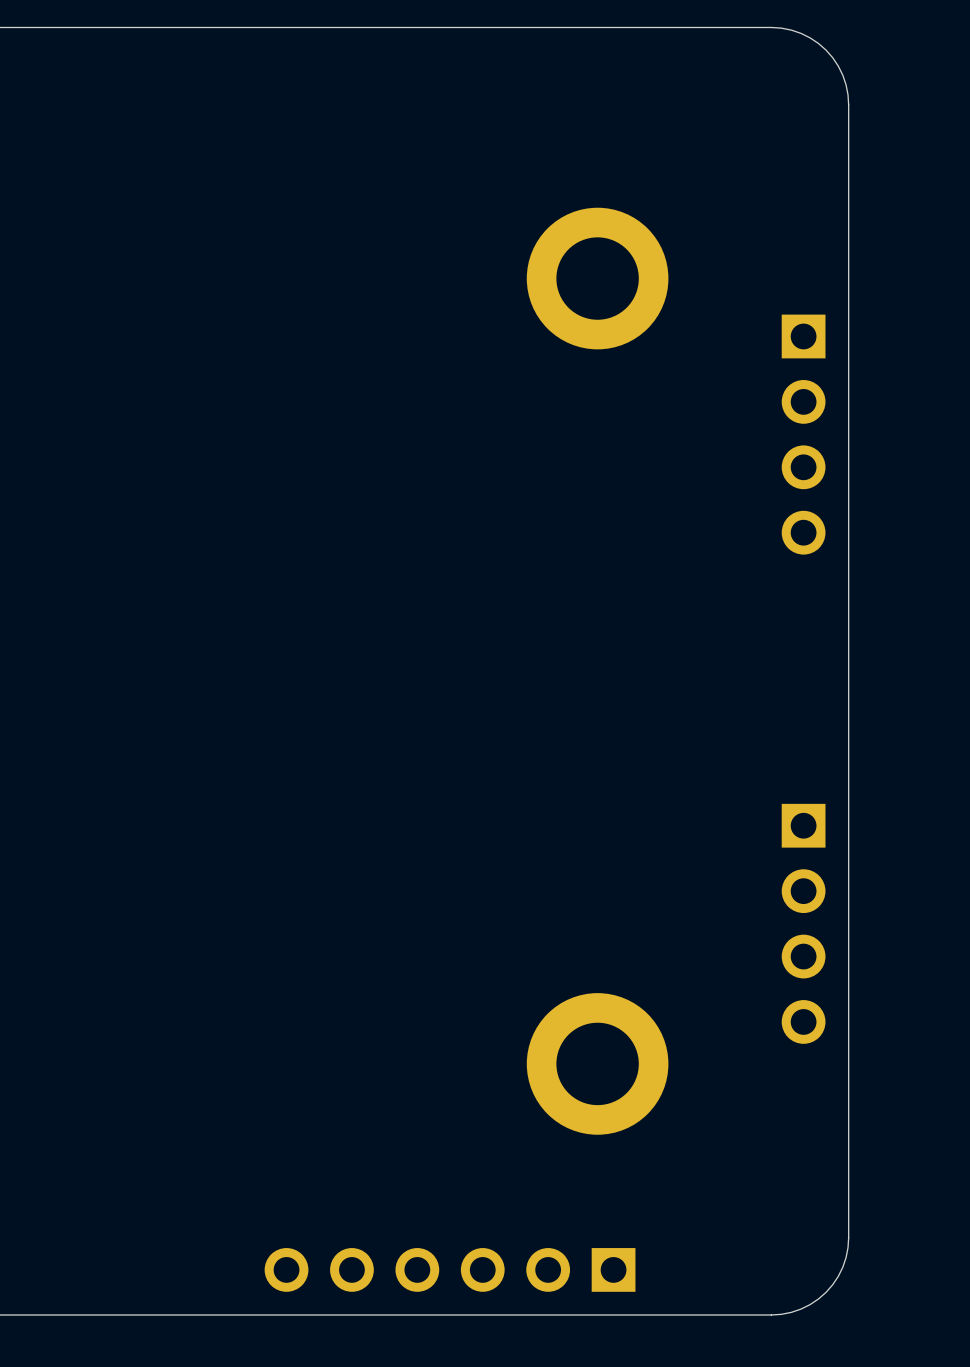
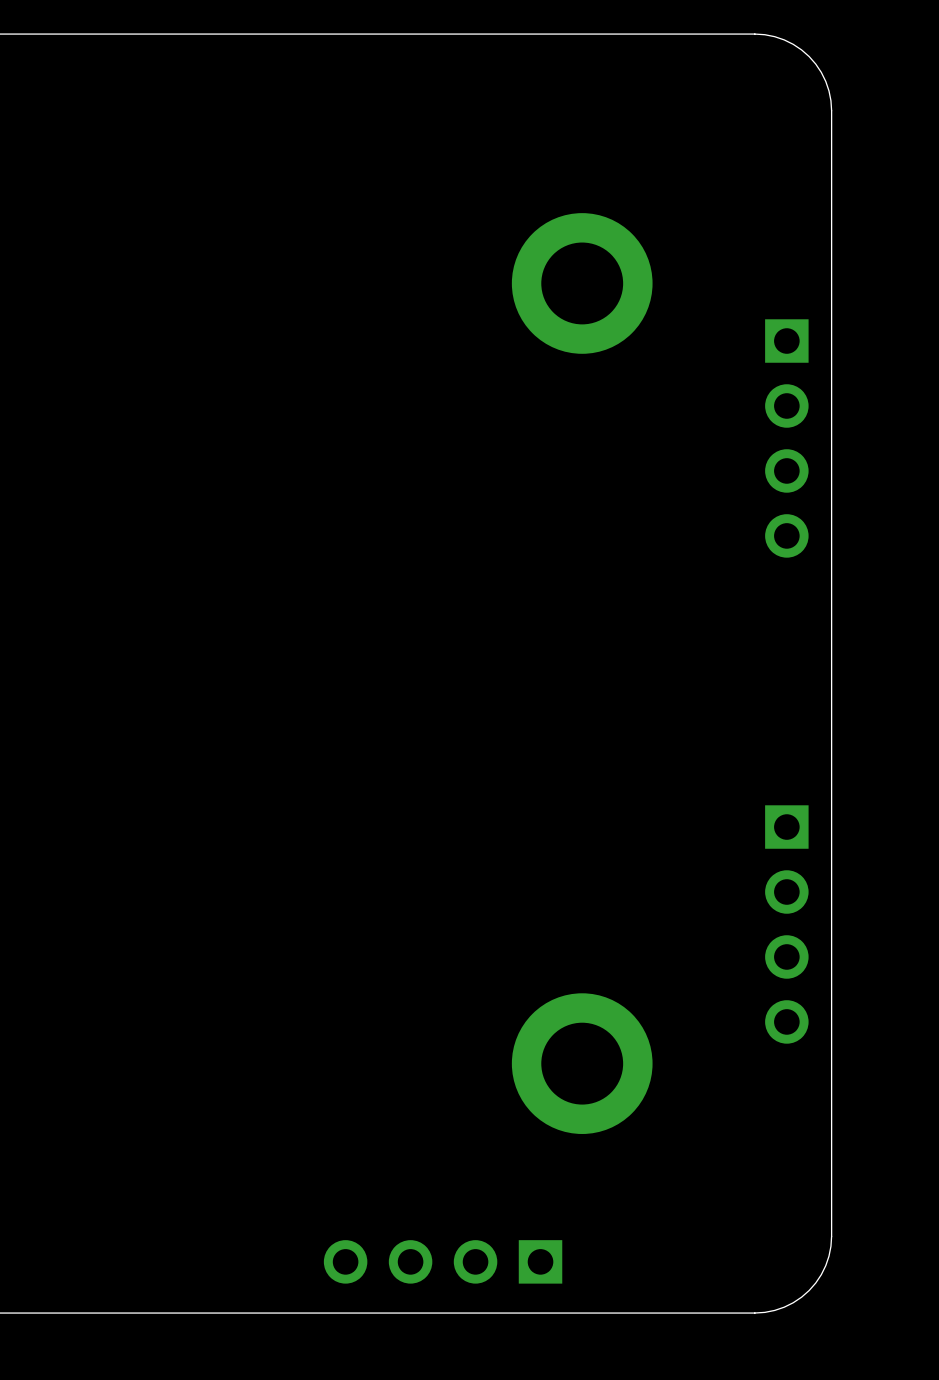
part footprint: [264, 1248, 636, 1292] -> [323, 1240, 563, 1284]

